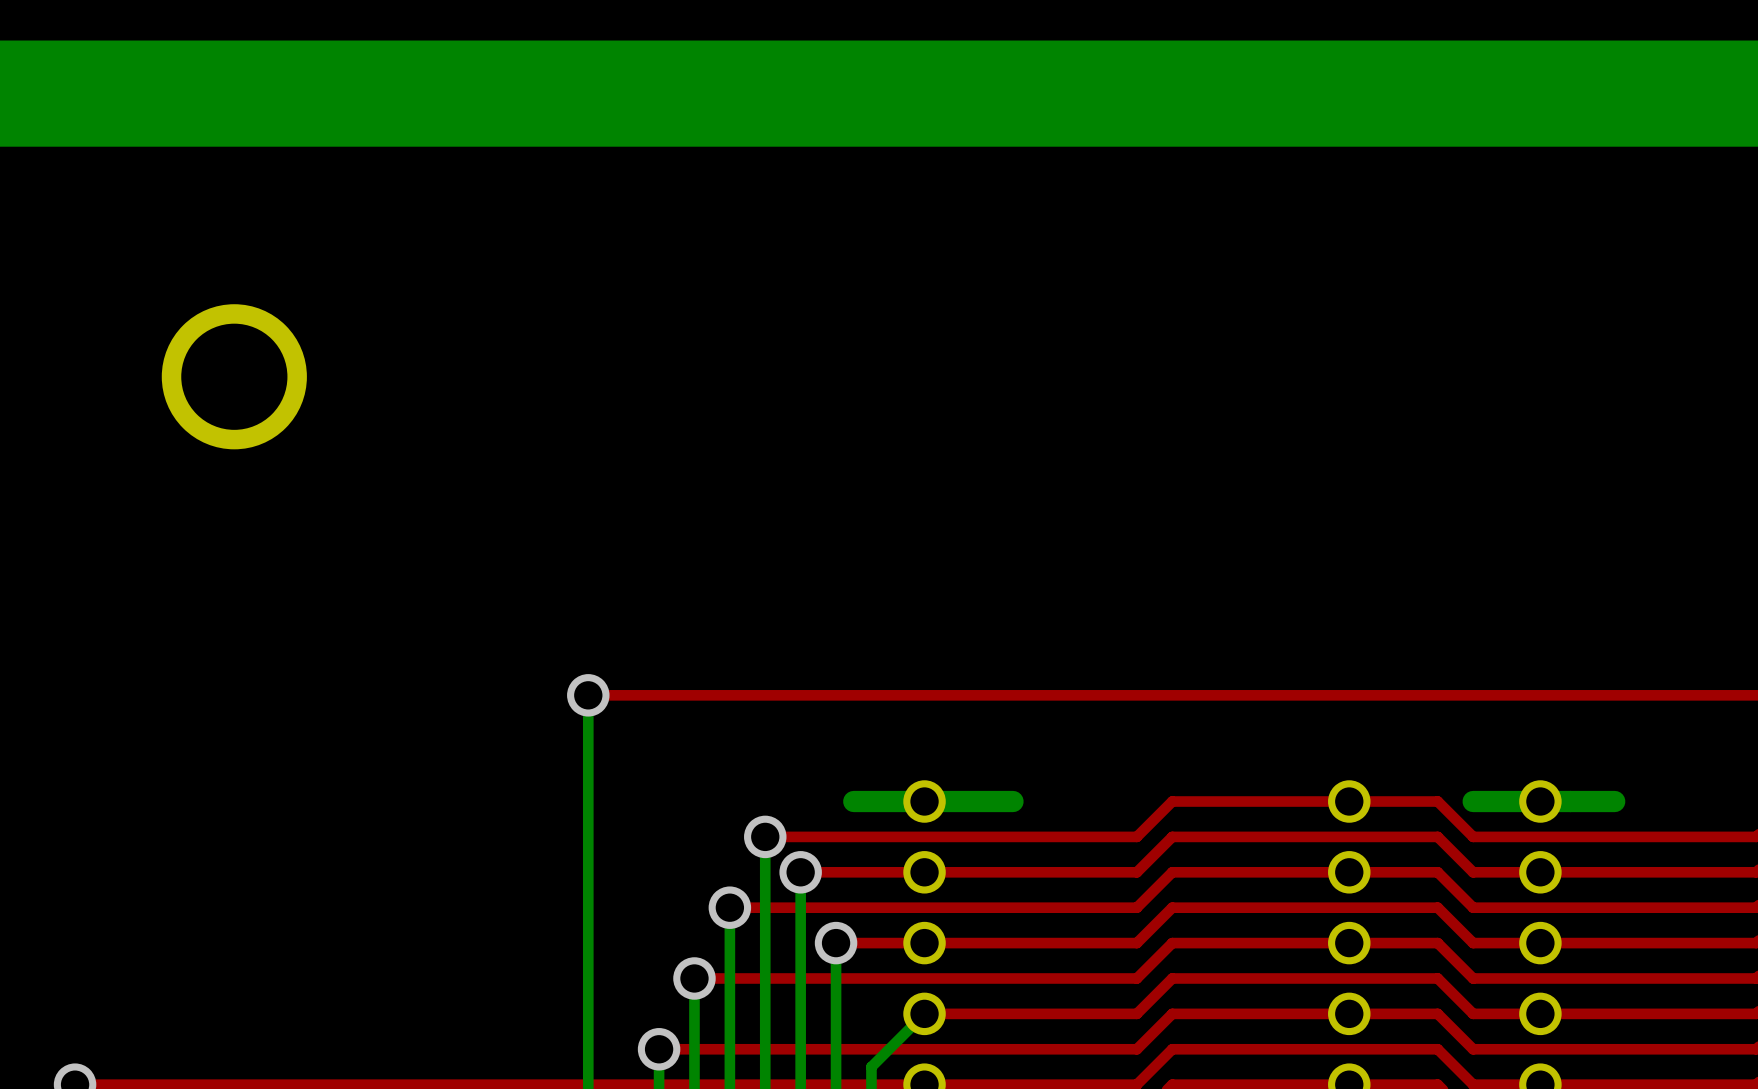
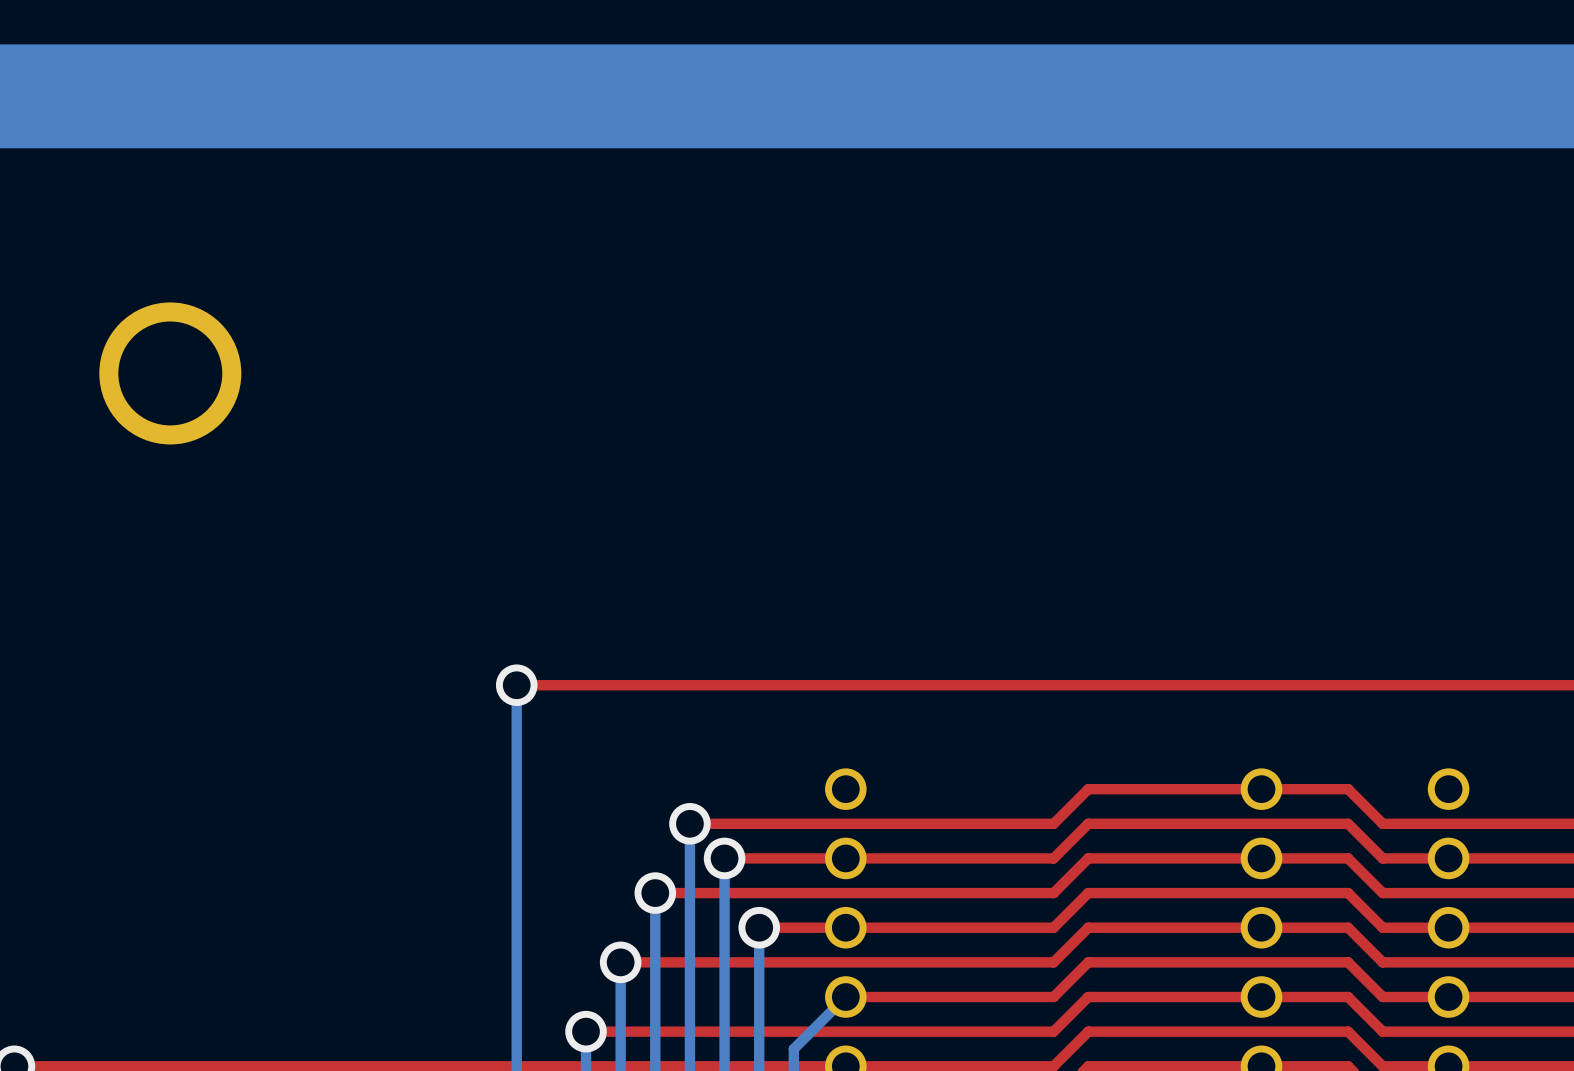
bottom track: (1013, 801) (853, 801) -> none
bottom track: (1614, 801) (1473, 801) -> none

